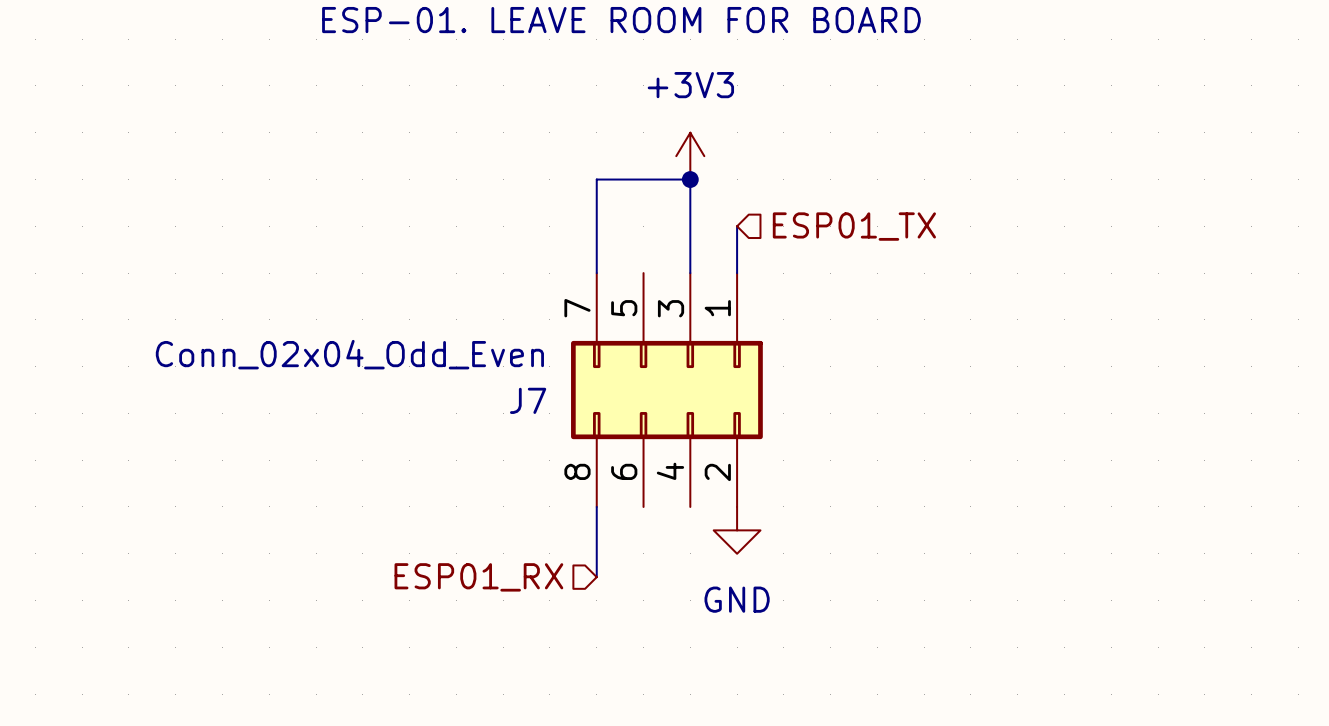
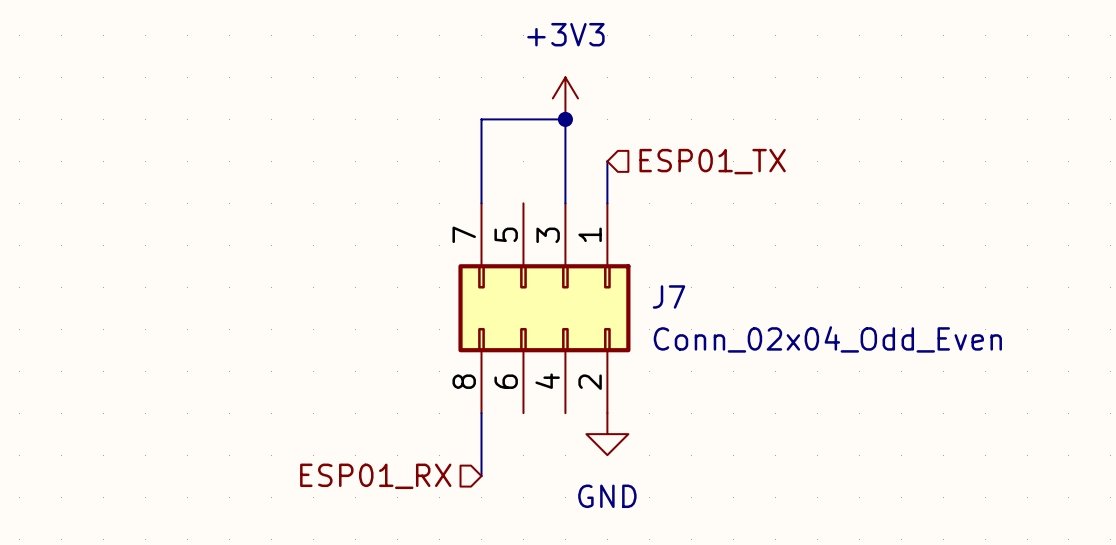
J7 value position: Conn_02x04_Odd_Even (349, 354) -> Conn_02x04_Odd_Even (827, 339)
J7 name position: J7 (528, 400) -> J7 (668, 296)

